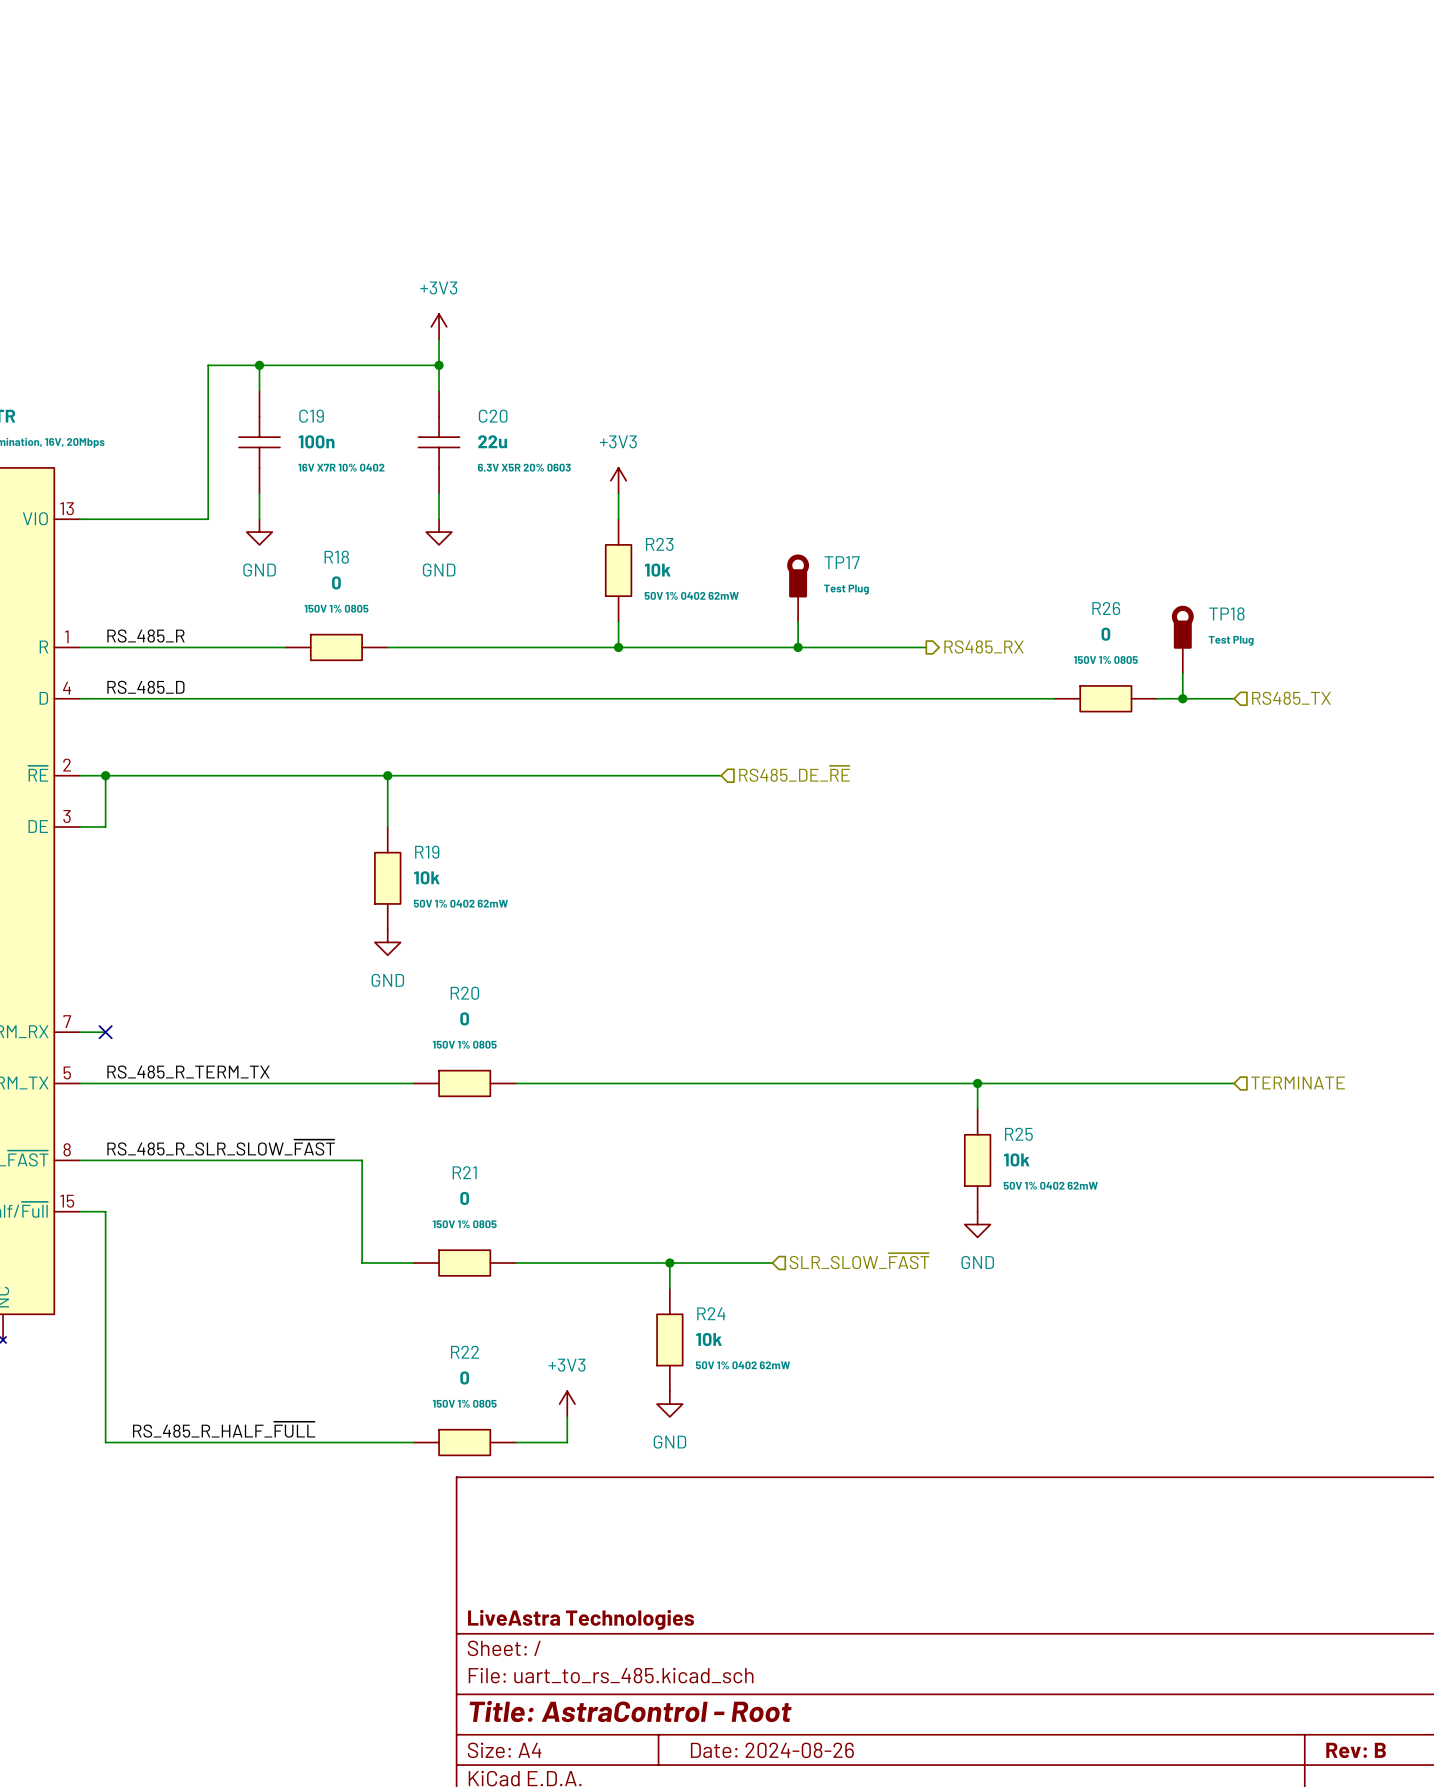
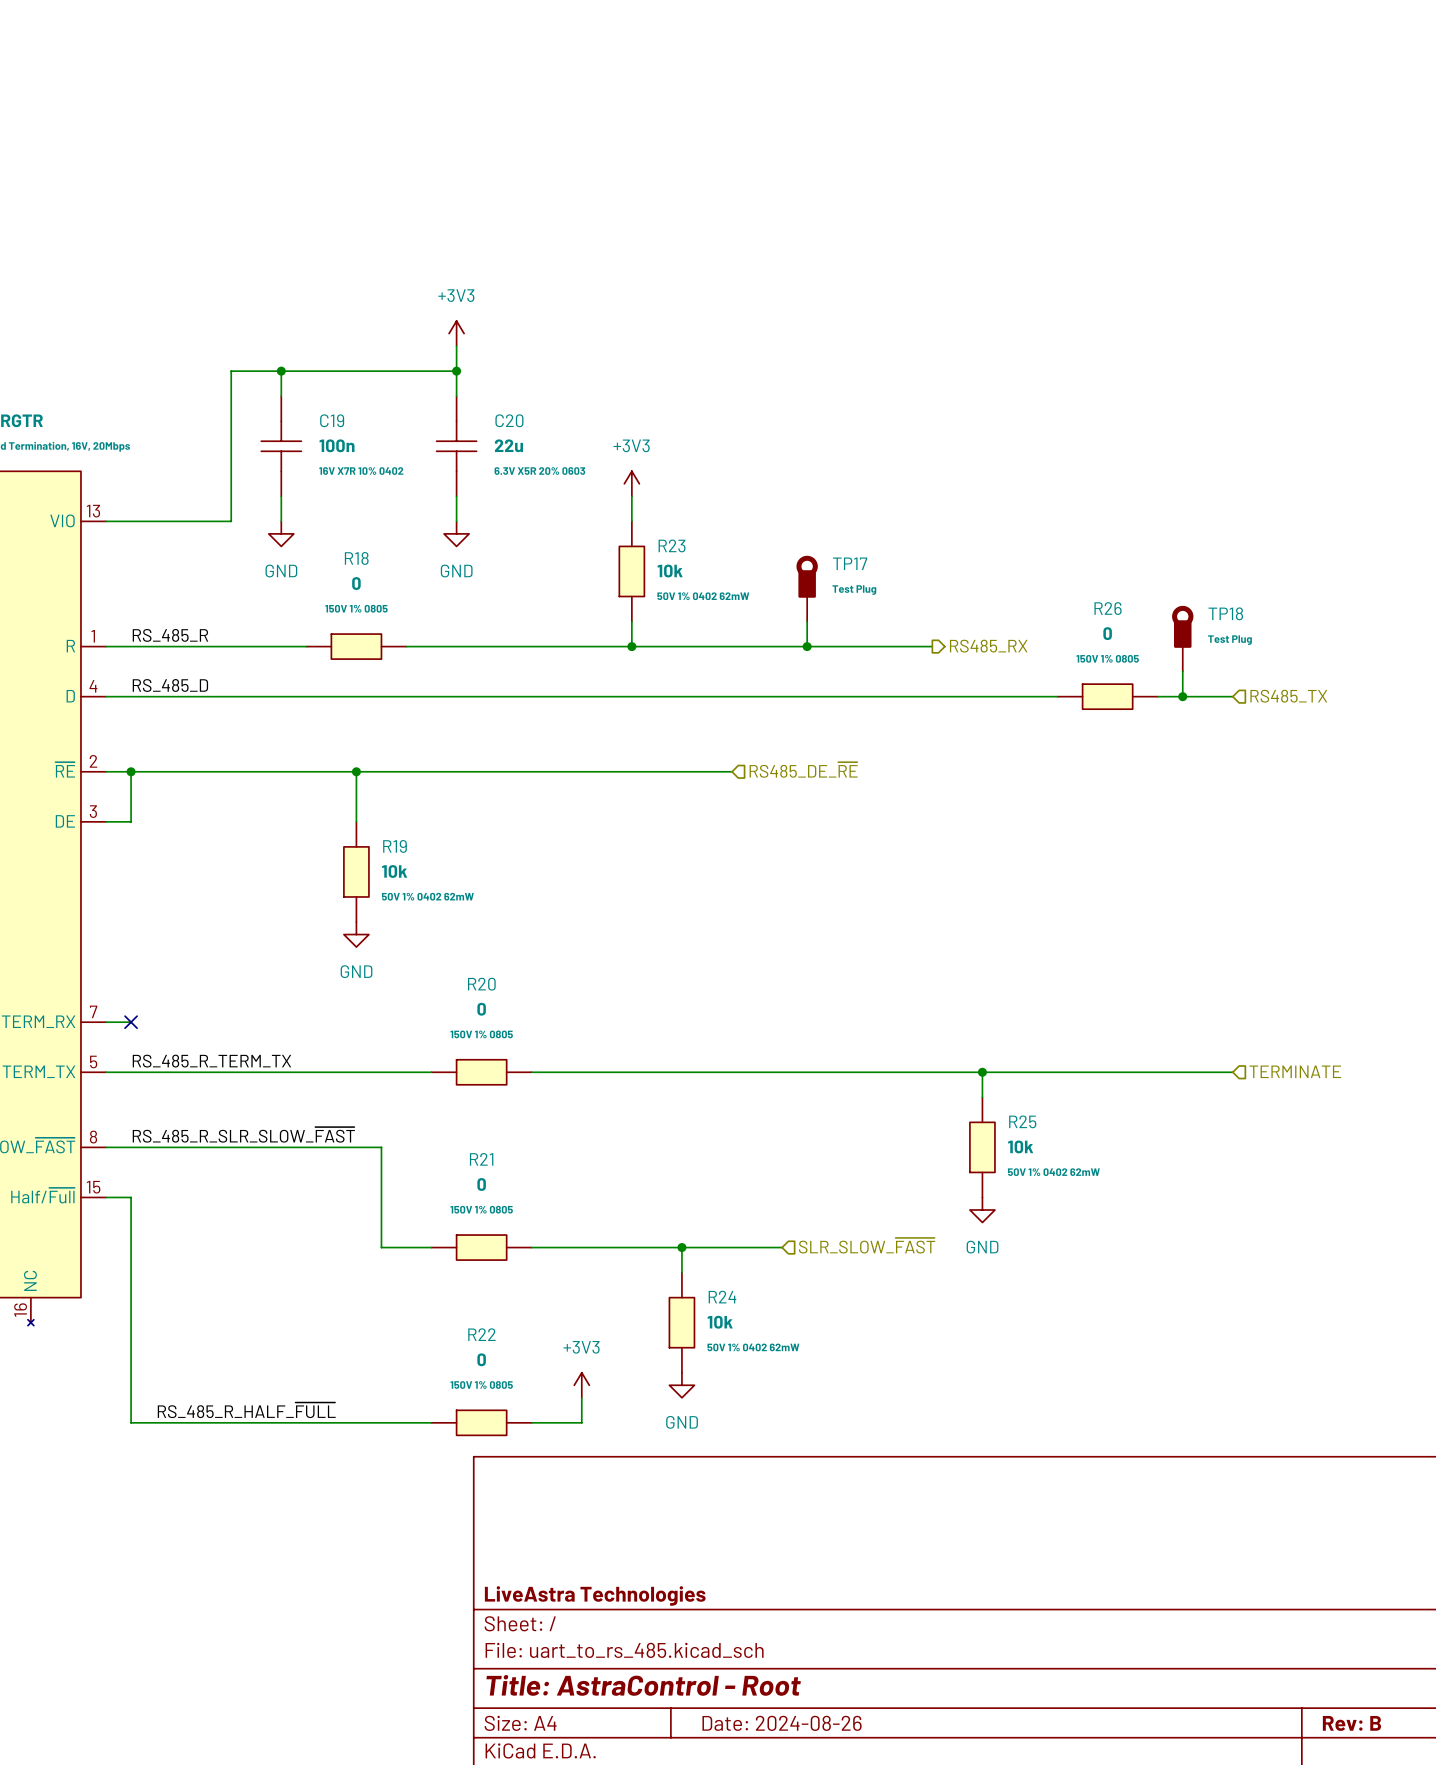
wire: (387, 775) (387, 827) -> (356, 771) (356, 821)
junction position: (387, 775) -> (356, 771)
R19 position: (387, 878) -> (356, 871)
power symbol position: GND (387, 942) -> GND (356, 934)

